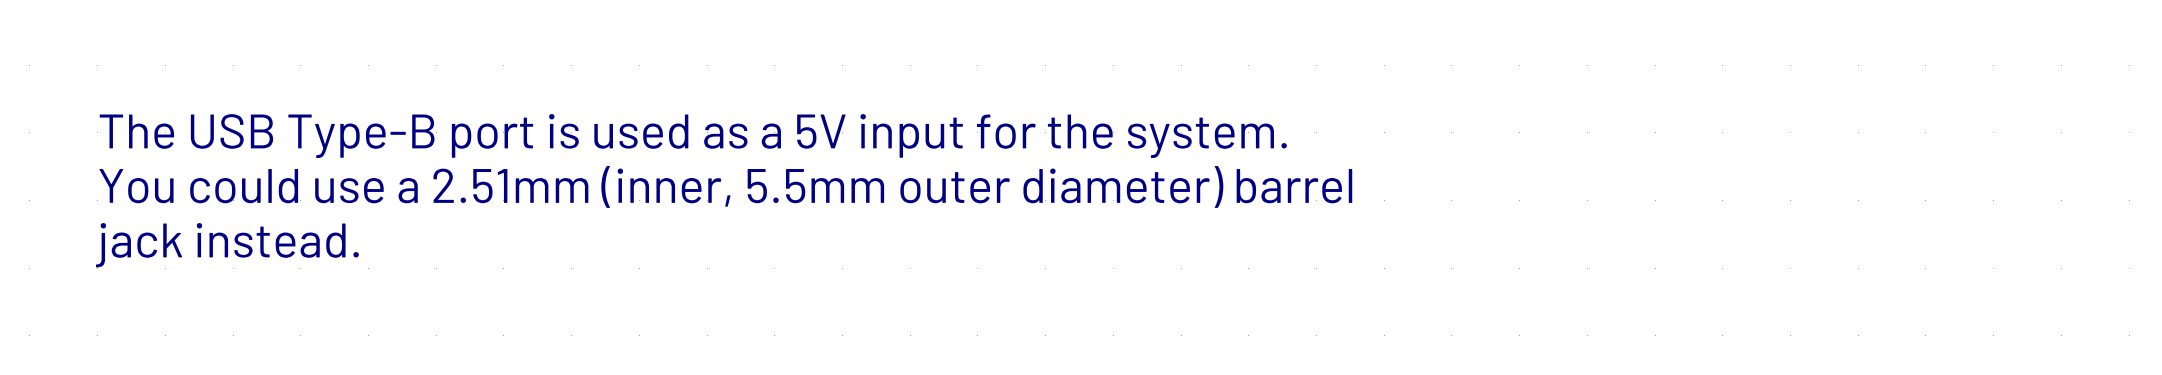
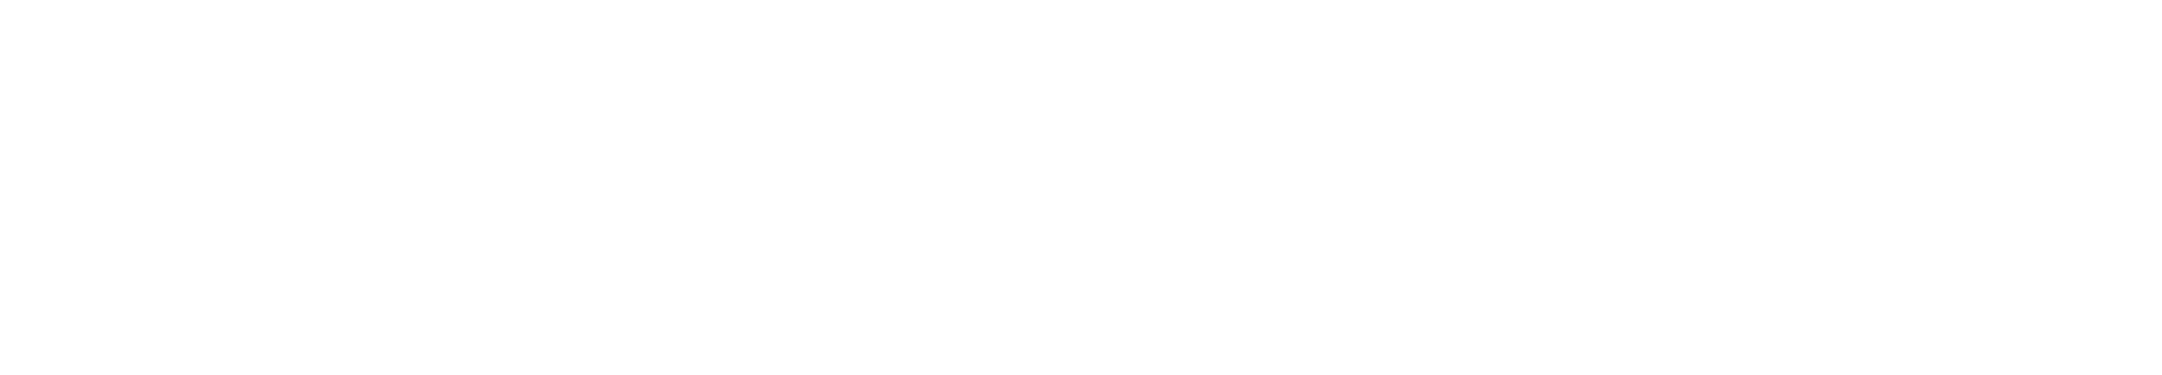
text: The USB Type-B port is used as a 5V input for the system. (693, 136) -> none
text: You could use a 2.51mm (inner, 5.5mm outer diameter) barrel (725, 186) -> none
text: jack instead. (227, 245) -> none

